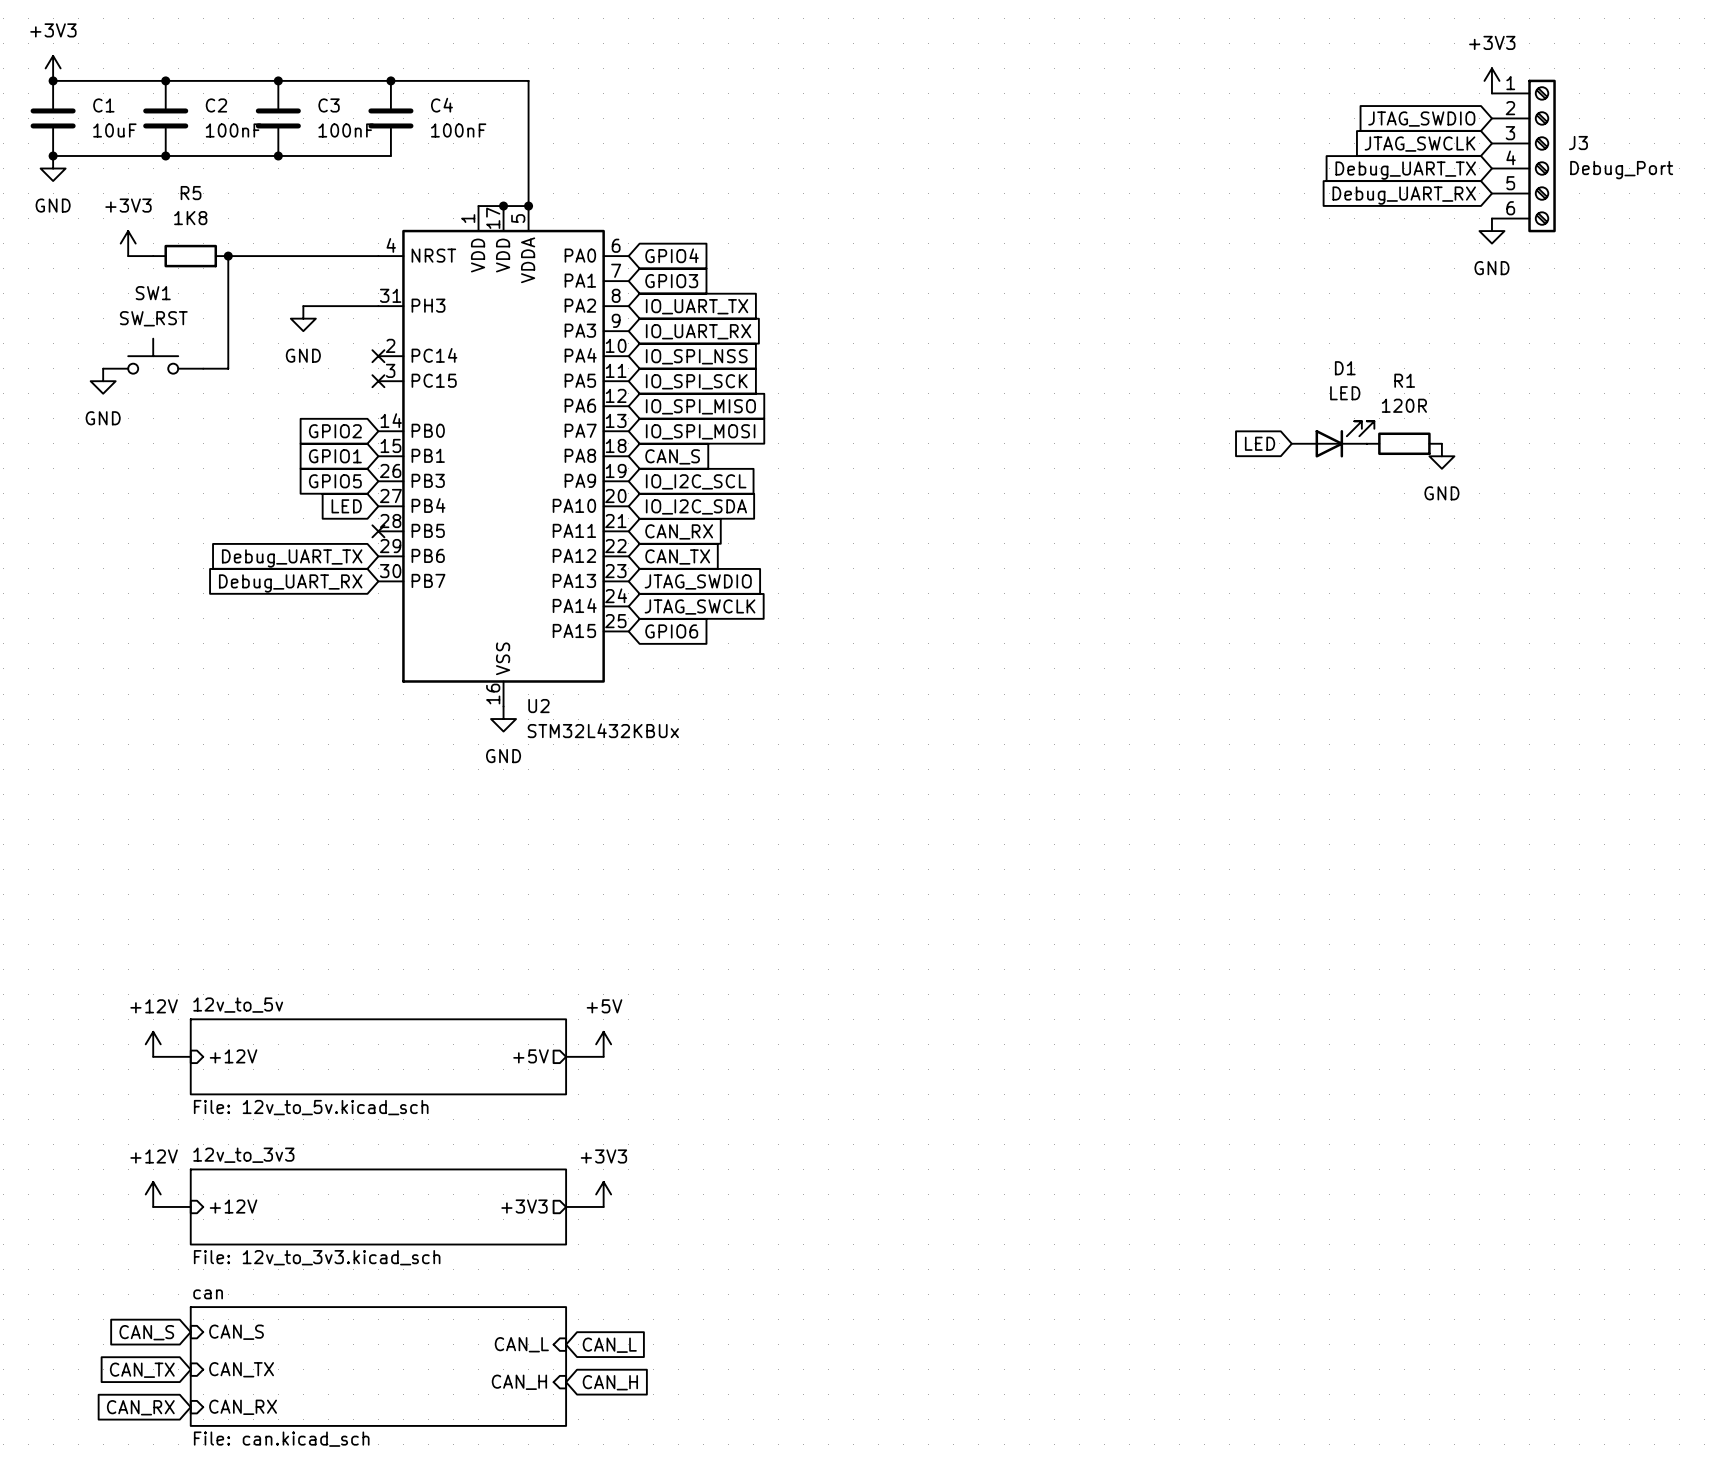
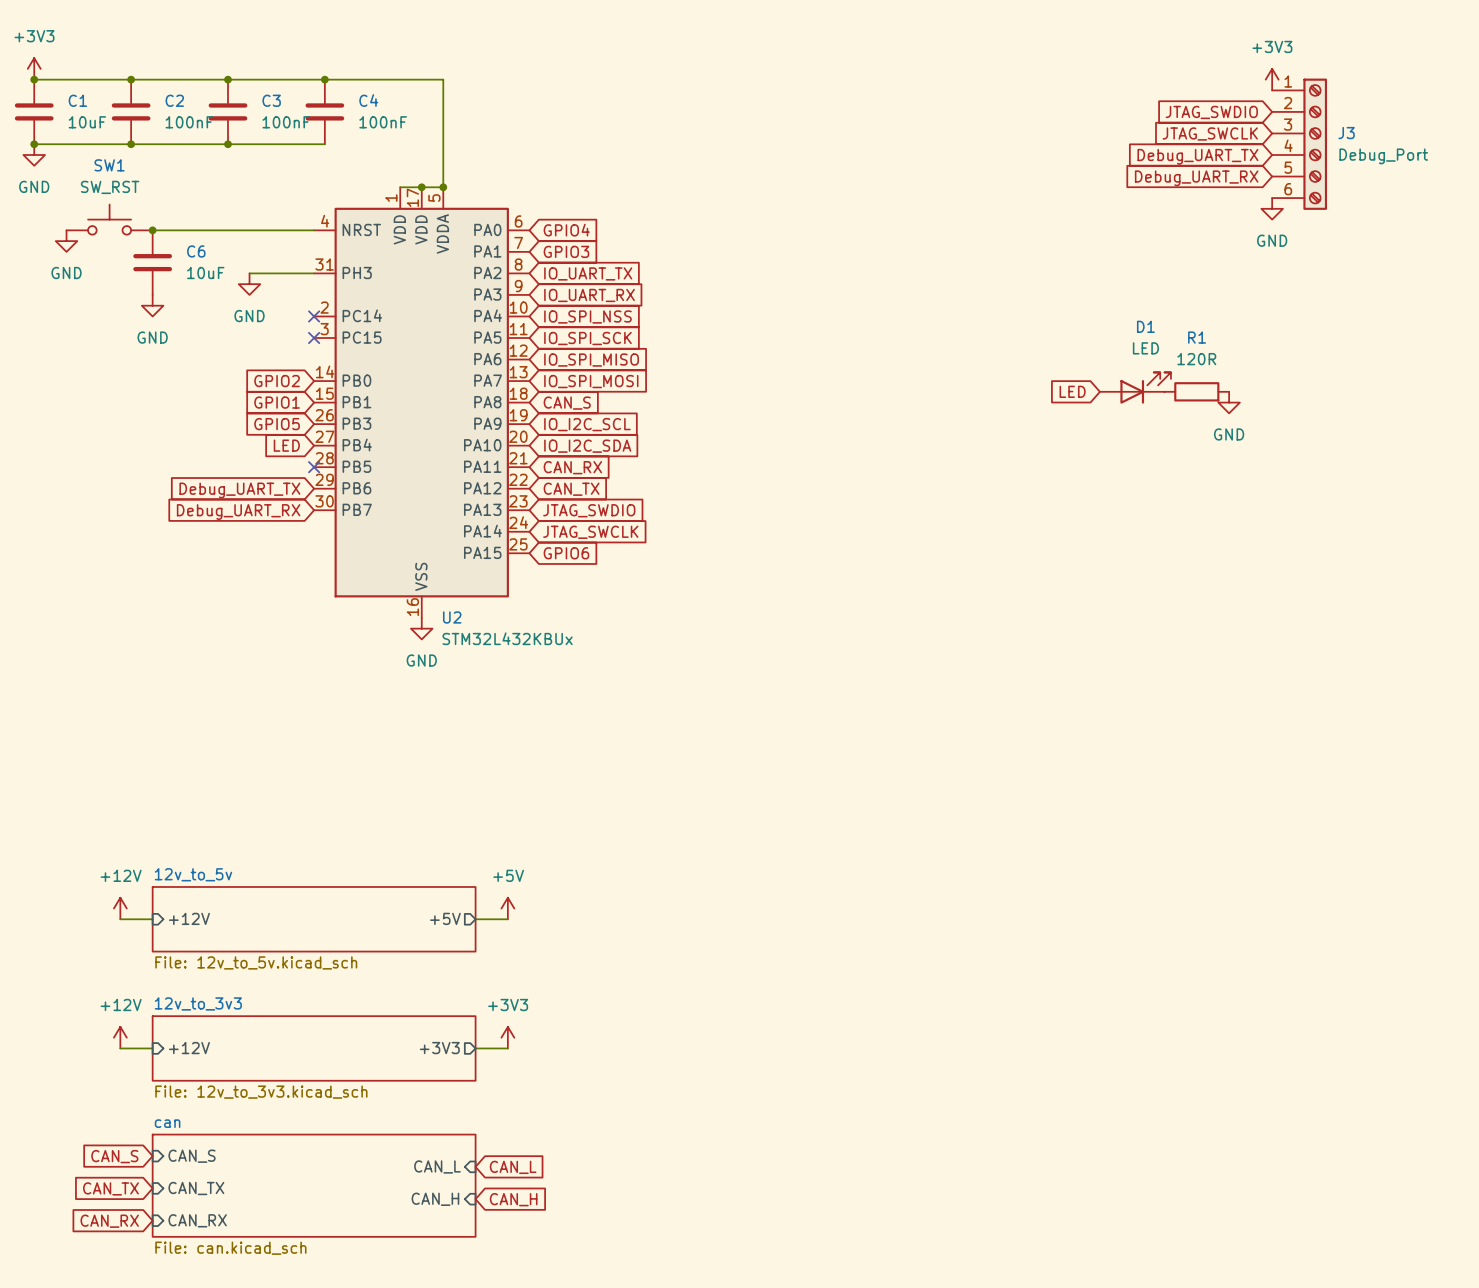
power symbol: +3V3 (128, 243) -> none
wire: (128, 256) (153, 256) -> none
R5: 1K8 (190, 256) -> none
wire: (228, 256) (228, 368) (203, 368) -> (184, 230) (152, 230)
junction position: (228, 256) -> (152, 230)
power symbol: none -> GND (66, 241)
C6: none -> 10uF (152, 262)
power symbol: none -> GND (152, 305)
SW1 position: (153, 356) -> (109, 219)
power symbol: GND (103, 381) -> none

